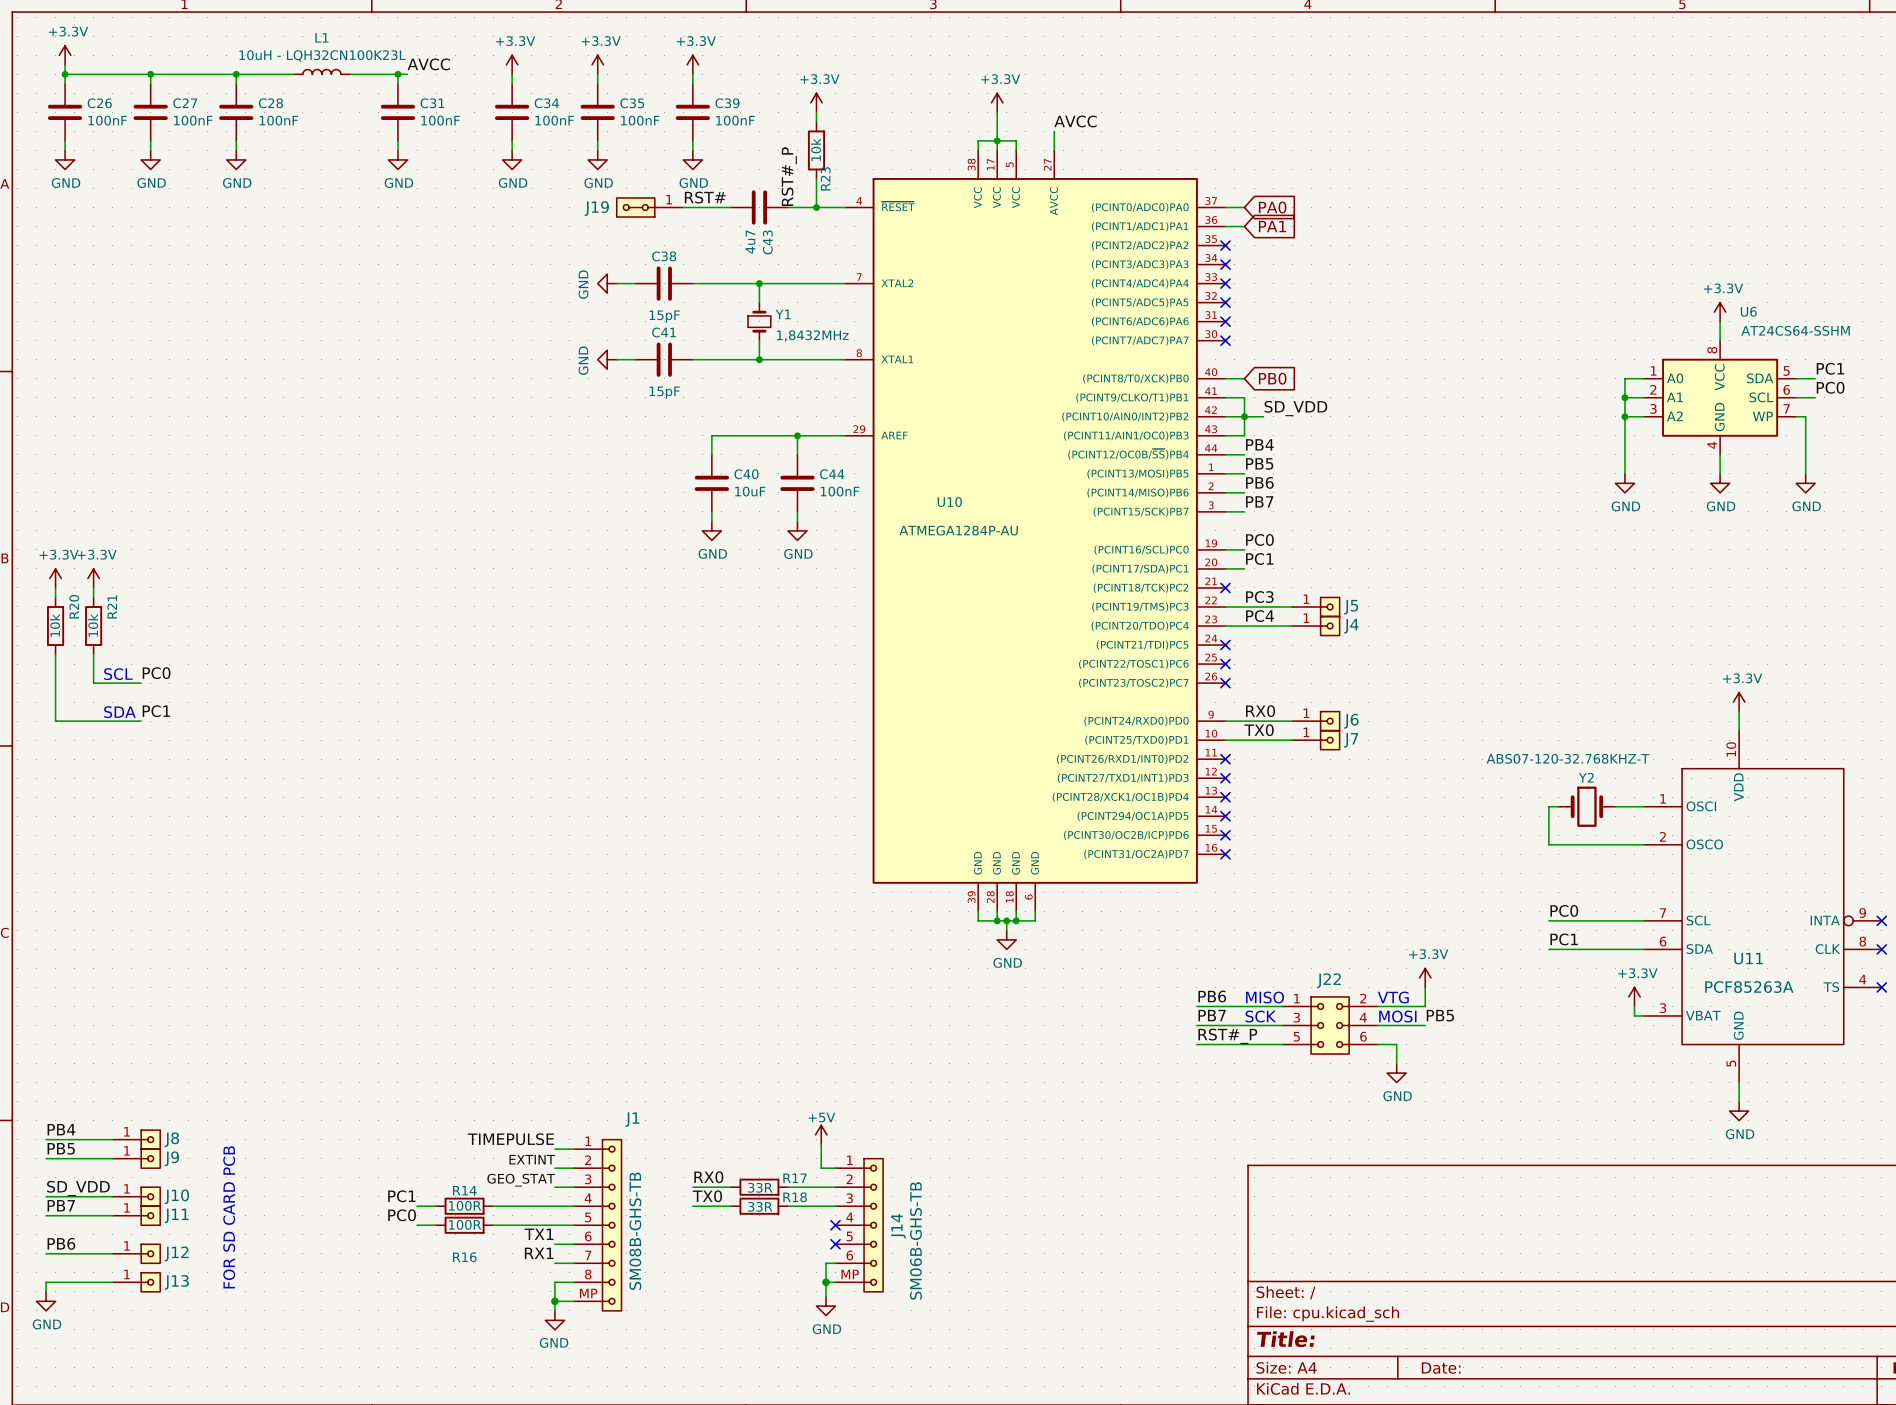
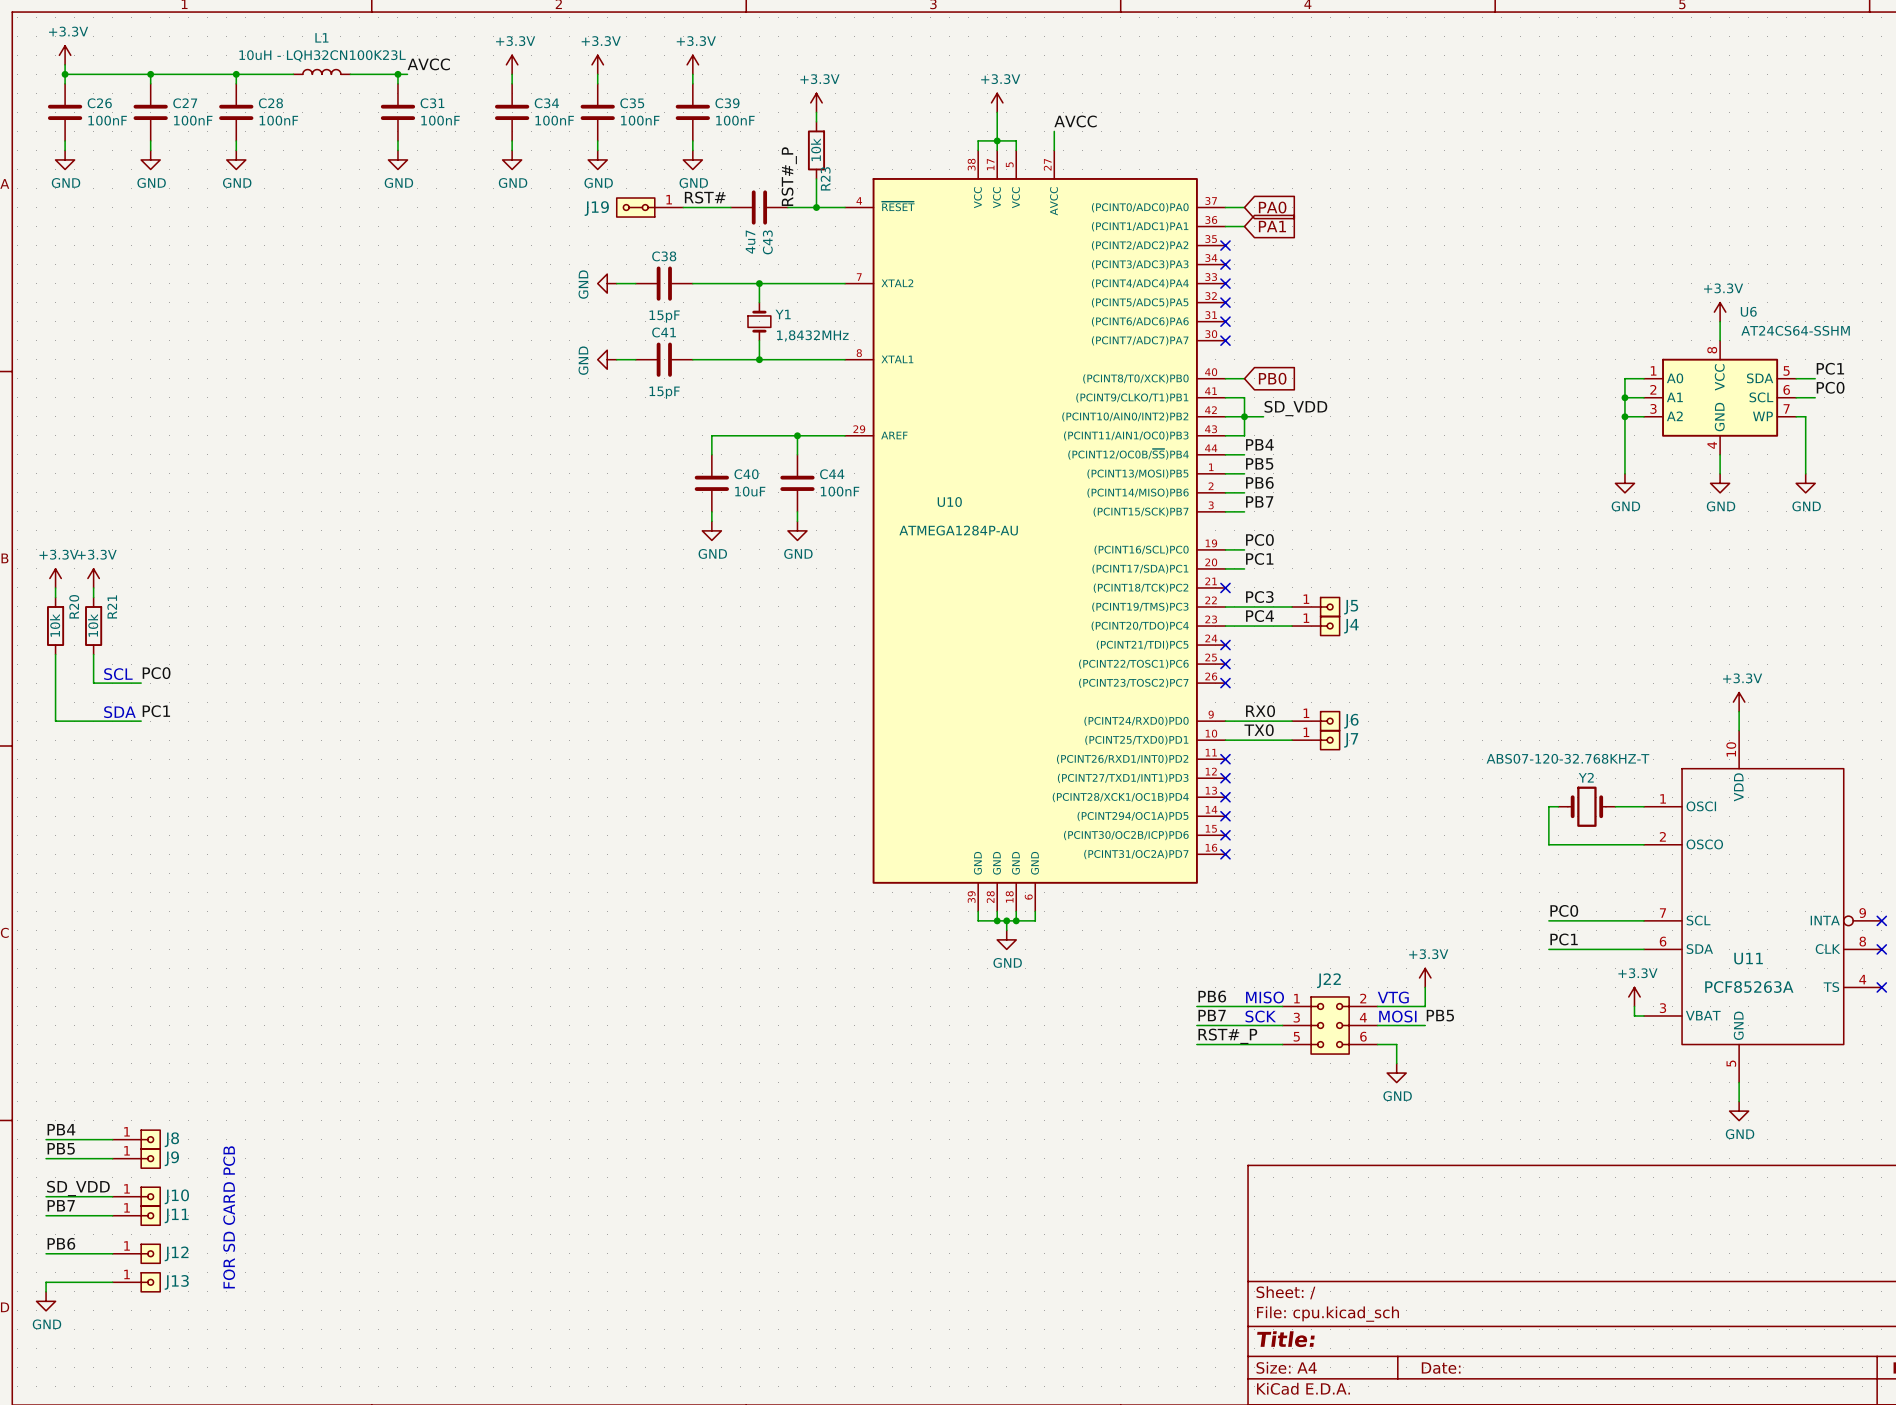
power symbol: +5V (821, 1134) -> none
label: TIMEPULSE (510, 1139) -> none
wire: (821, 1144) (821, 1168) (835, 1168) -> none
wire: (554, 1149) (573, 1149) -> none
label: EXTINT (532, 1159) -> none
wire: (554, 1168) (573, 1168) -> none
label: RX0 (708, 1177) -> none
label: GEO_STAT (521, 1180) -> none
wire: (554, 1187) (573, 1187) -> none
wire: (692, 1187) (730, 1187) -> none
R17: 33R (759, 1187) -> none
wire: (787, 1187) (835, 1187) -> none
label: PC1 (401, 1196) -> none
label: TX0 (707, 1196) -> none
wire: (417, 1206) (436, 1206) -> none
R14: 100R (464, 1206) -> none
wire: (493, 1206) (573, 1206) -> none
wire: (692, 1206) (730, 1206) -> none
R18: 33R (759, 1206) -> none
wire: (787, 1206) (835, 1206) -> none
label: PC0 (402, 1215) -> none
wire: (417, 1225) (436, 1225) -> none
R16: 100R (464, 1225) -> none
wire: (493, 1225) (573, 1225) -> none
J1: SM08B-GHS-TB (597, 1225) -> none
no-connect mark: (835, 1225) -> none
J14: SM06B-GHS-TB (859, 1225) -> none
label: TX1 (539, 1234) -> none
wire: (554, 1244) (573, 1244) -> none
no-connect mark: (835, 1244) -> none
label: RX1 (539, 1253) -> none
wire: (554, 1263) (573, 1263) -> none
wire: (835, 1263) (826, 1263) (826, 1296) -> none
wire: (573, 1282) (554, 1282) (554, 1310) -> none
wire: (826, 1282) (835, 1282) -> none
junction: (826, 1282) -> none
wire: (554, 1301) (573, 1301) -> none
junction: (554, 1301) -> none
power symbol: GND (826, 1306) -> none
power symbol: GND (554, 1320) -> none

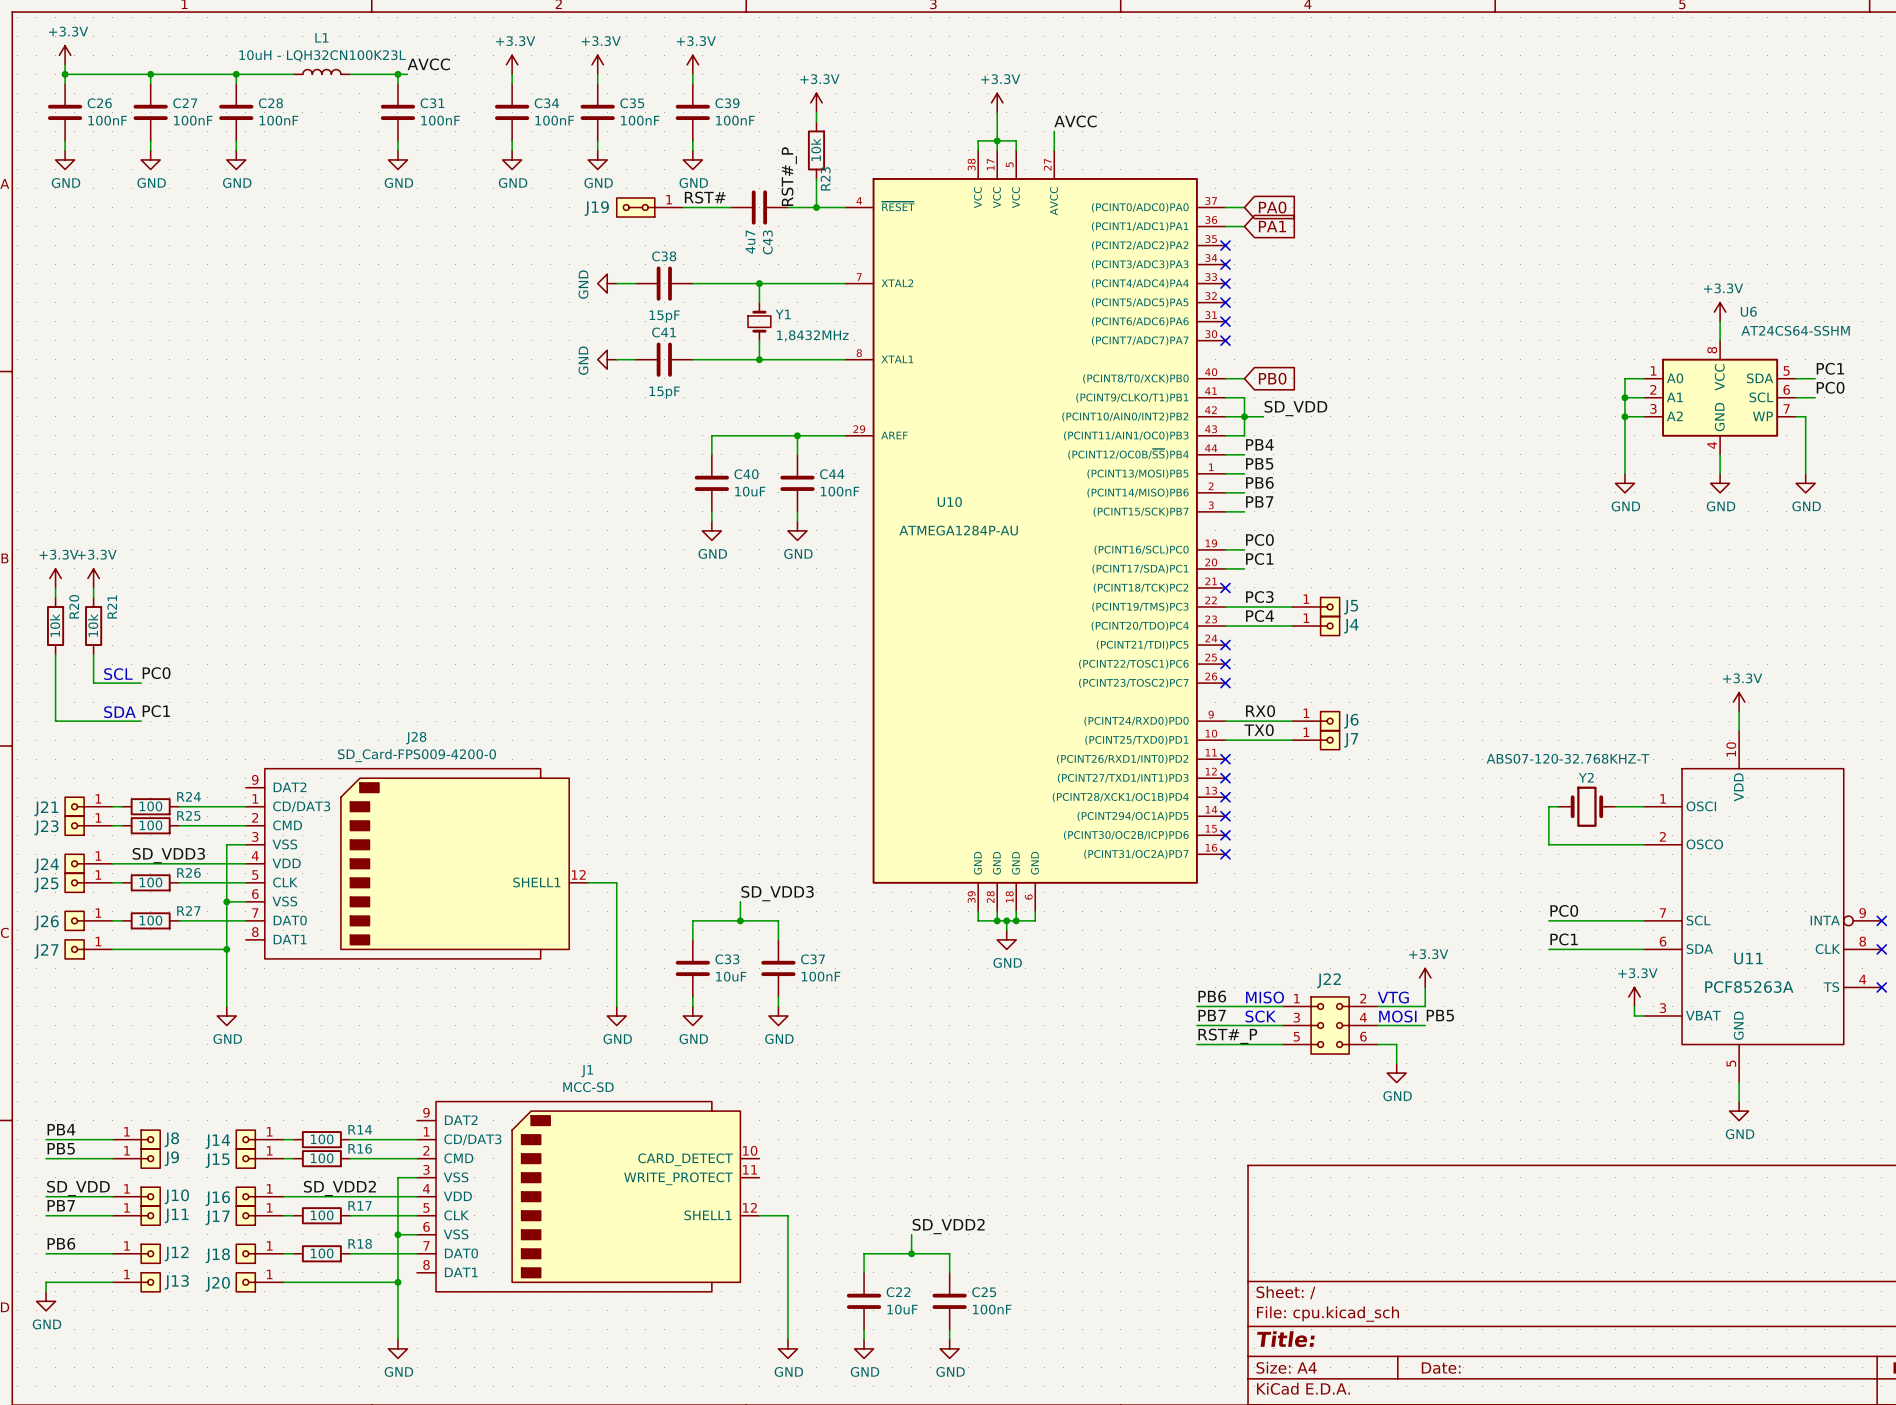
J21: none -> (88, 806)
wire: none -> (112, 806) (122, 806)
R24: none -> 100 (150, 806)
wire: none -> (179, 806) (245, 806)
J23: none -> (88, 825)
wire: none -> (112, 825) (122, 825)
R25: none -> 100 (150, 825)
wire: none -> (179, 825) (245, 825)
wire: none -> (245, 844) (226, 844) (226, 1006)
label: none -> SD_VDD3 (168, 855)
J24: none -> (88, 863)
wire: none -> (112, 863) (245, 863)
J28: none -> SD_Card-FPS009-4200-0 (417, 863)
J25: none -> (88, 882)
wire: none -> (112, 882) (122, 882)
R26: none -> 100 (150, 882)
wire: none -> (179, 882) (245, 882)
wire: none -> (588, 882) (616, 882) (616, 1006)
label: none -> SD_VDD3 (777, 893)
wire: none -> (226, 901) (245, 901)
junction: none -> (226, 901)
wire: none -> (740, 901) (740, 920)
J26: none -> (88, 920)
wire: none -> (112, 920) (122, 920)
R27: none -> 100 (150, 920)
wire: none -> (179, 920) (245, 920)
junction: none -> (740, 920)
wire: none -> (692, 939) (692, 920) (778, 920) (778, 939)
J27: none -> (88, 949)
wire: none -> (112, 949) (226, 949)
junction: none -> (226, 949)
C33: none -> 10uF (692, 968)
C37: none -> 100nF (778, 968)
wire: none -> (692, 996) (692, 1006)
wire: none -> (778, 996) (778, 1006)
power symbol: none -> GND (226, 1015)
power symbol: none -> GND (616, 1015)
power symbol: none -> GND (692, 1015)
power symbol: none -> GND (778, 1015)
J14: none -> (260, 1139)
wire: none -> (283, 1139) (293, 1139)
R14: none -> 100 (321, 1139)
wire: none -> (350, 1139) (417, 1139)
J15: none -> (260, 1158)
wire: none -> (283, 1158) (293, 1158)
R16: none -> 100 (321, 1158)
wire: none -> (350, 1158) (417, 1158)
wire: none -> (417, 1177) (397, 1177) (397, 1339)
label: none -> SD_VDD2 (339, 1188)
J16: none -> (260, 1196)
wire: none -> (283, 1196) (417, 1196)
J1: none -> MCC-SD (588, 1196)
J17: none -> (260, 1215)
wire: none -> (283, 1215) (293, 1215)
R17: none -> 100 (321, 1215)
wire: none -> (350, 1215) (417, 1215)
wire: none -> (759, 1215) (787, 1215) (787, 1339)
text: FOR SD CARD PCB (229, 1217) -> none
label: none -> SD_VDD2 (948, 1226)
wire: none -> (397, 1234) (417, 1234)
junction: none -> (397, 1234)
wire: none -> (911, 1234) (911, 1253)
J18: none -> (260, 1253)
wire: none -> (283, 1253) (293, 1253)
R18: none -> 100 (321, 1253)
wire: none -> (350, 1253) (417, 1253)
junction: none -> (911, 1253)
wire: none -> (864, 1272) (864, 1253) (949, 1253) (949, 1272)
J20: none -> (260, 1282)
wire: none -> (283, 1282) (397, 1282)
junction: none -> (397, 1282)
C22: none -> 10uF (864, 1301)
C25: none -> 100nF (949, 1301)
wire: none -> (864, 1329) (864, 1339)
wire: none -> (949, 1329) (949, 1339)
power symbol: none -> GND (397, 1348)
power symbol: none -> GND (787, 1348)
power symbol: none -> GND (864, 1348)
power symbol: none -> GND (949, 1348)

